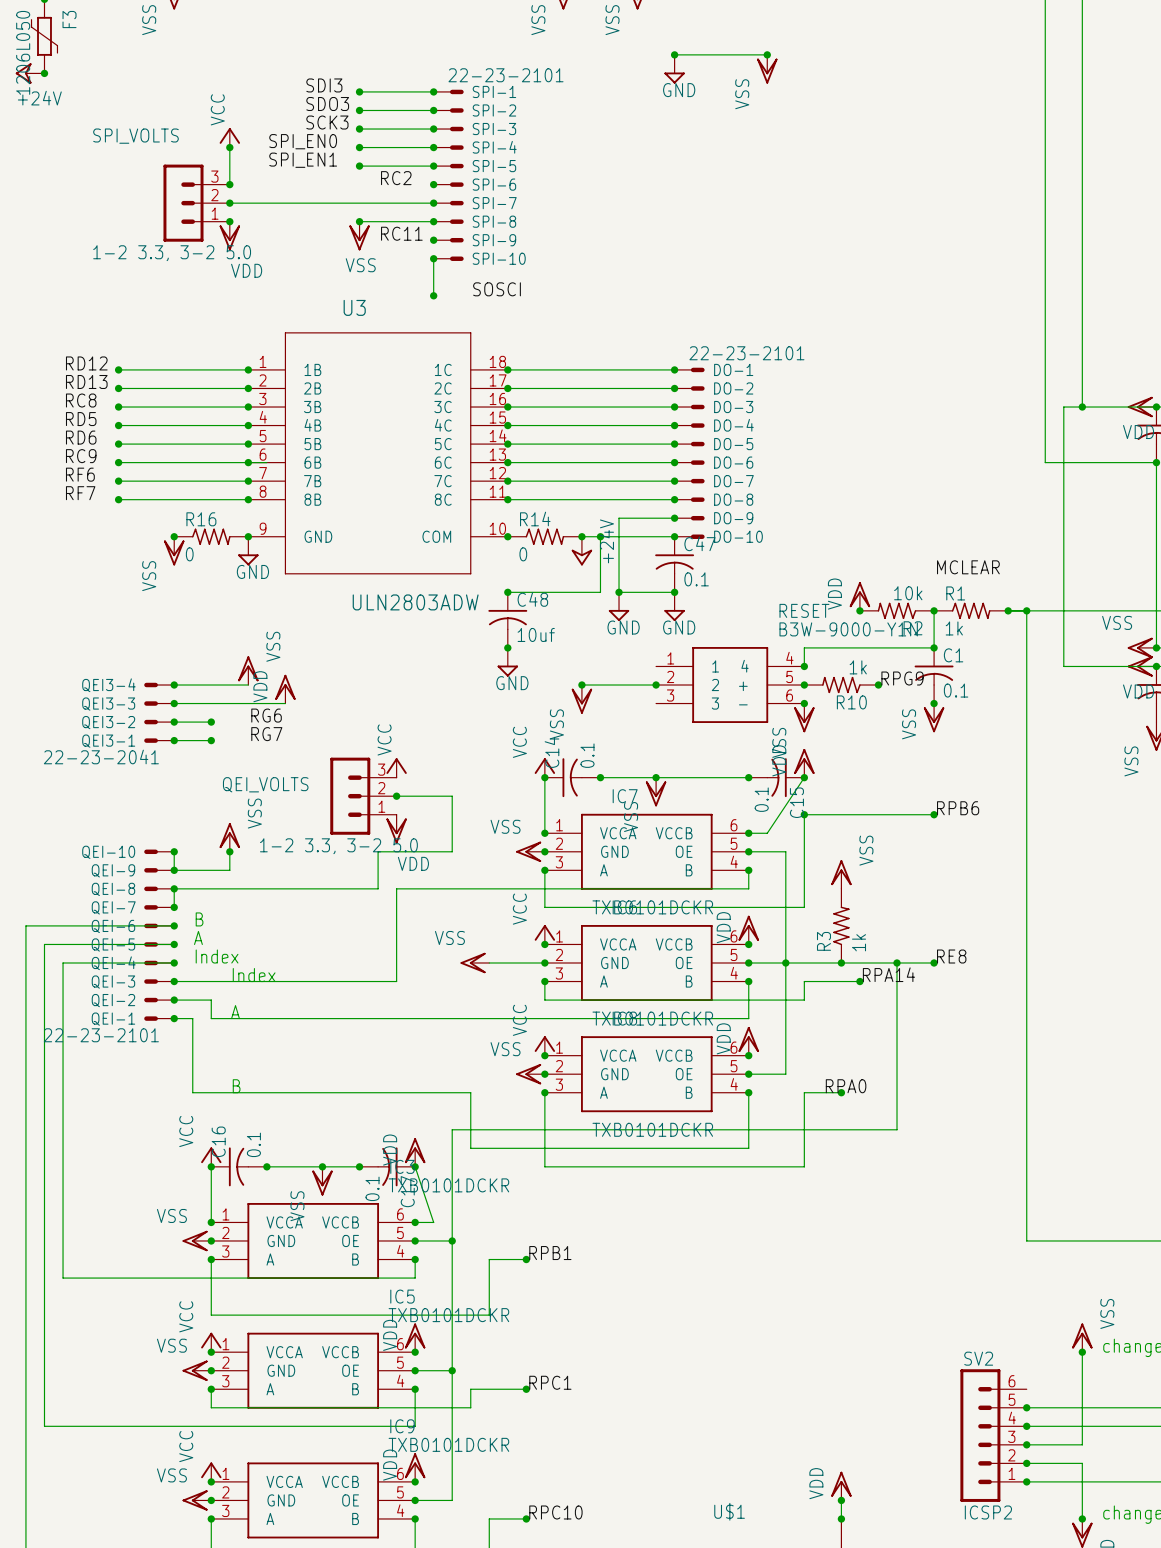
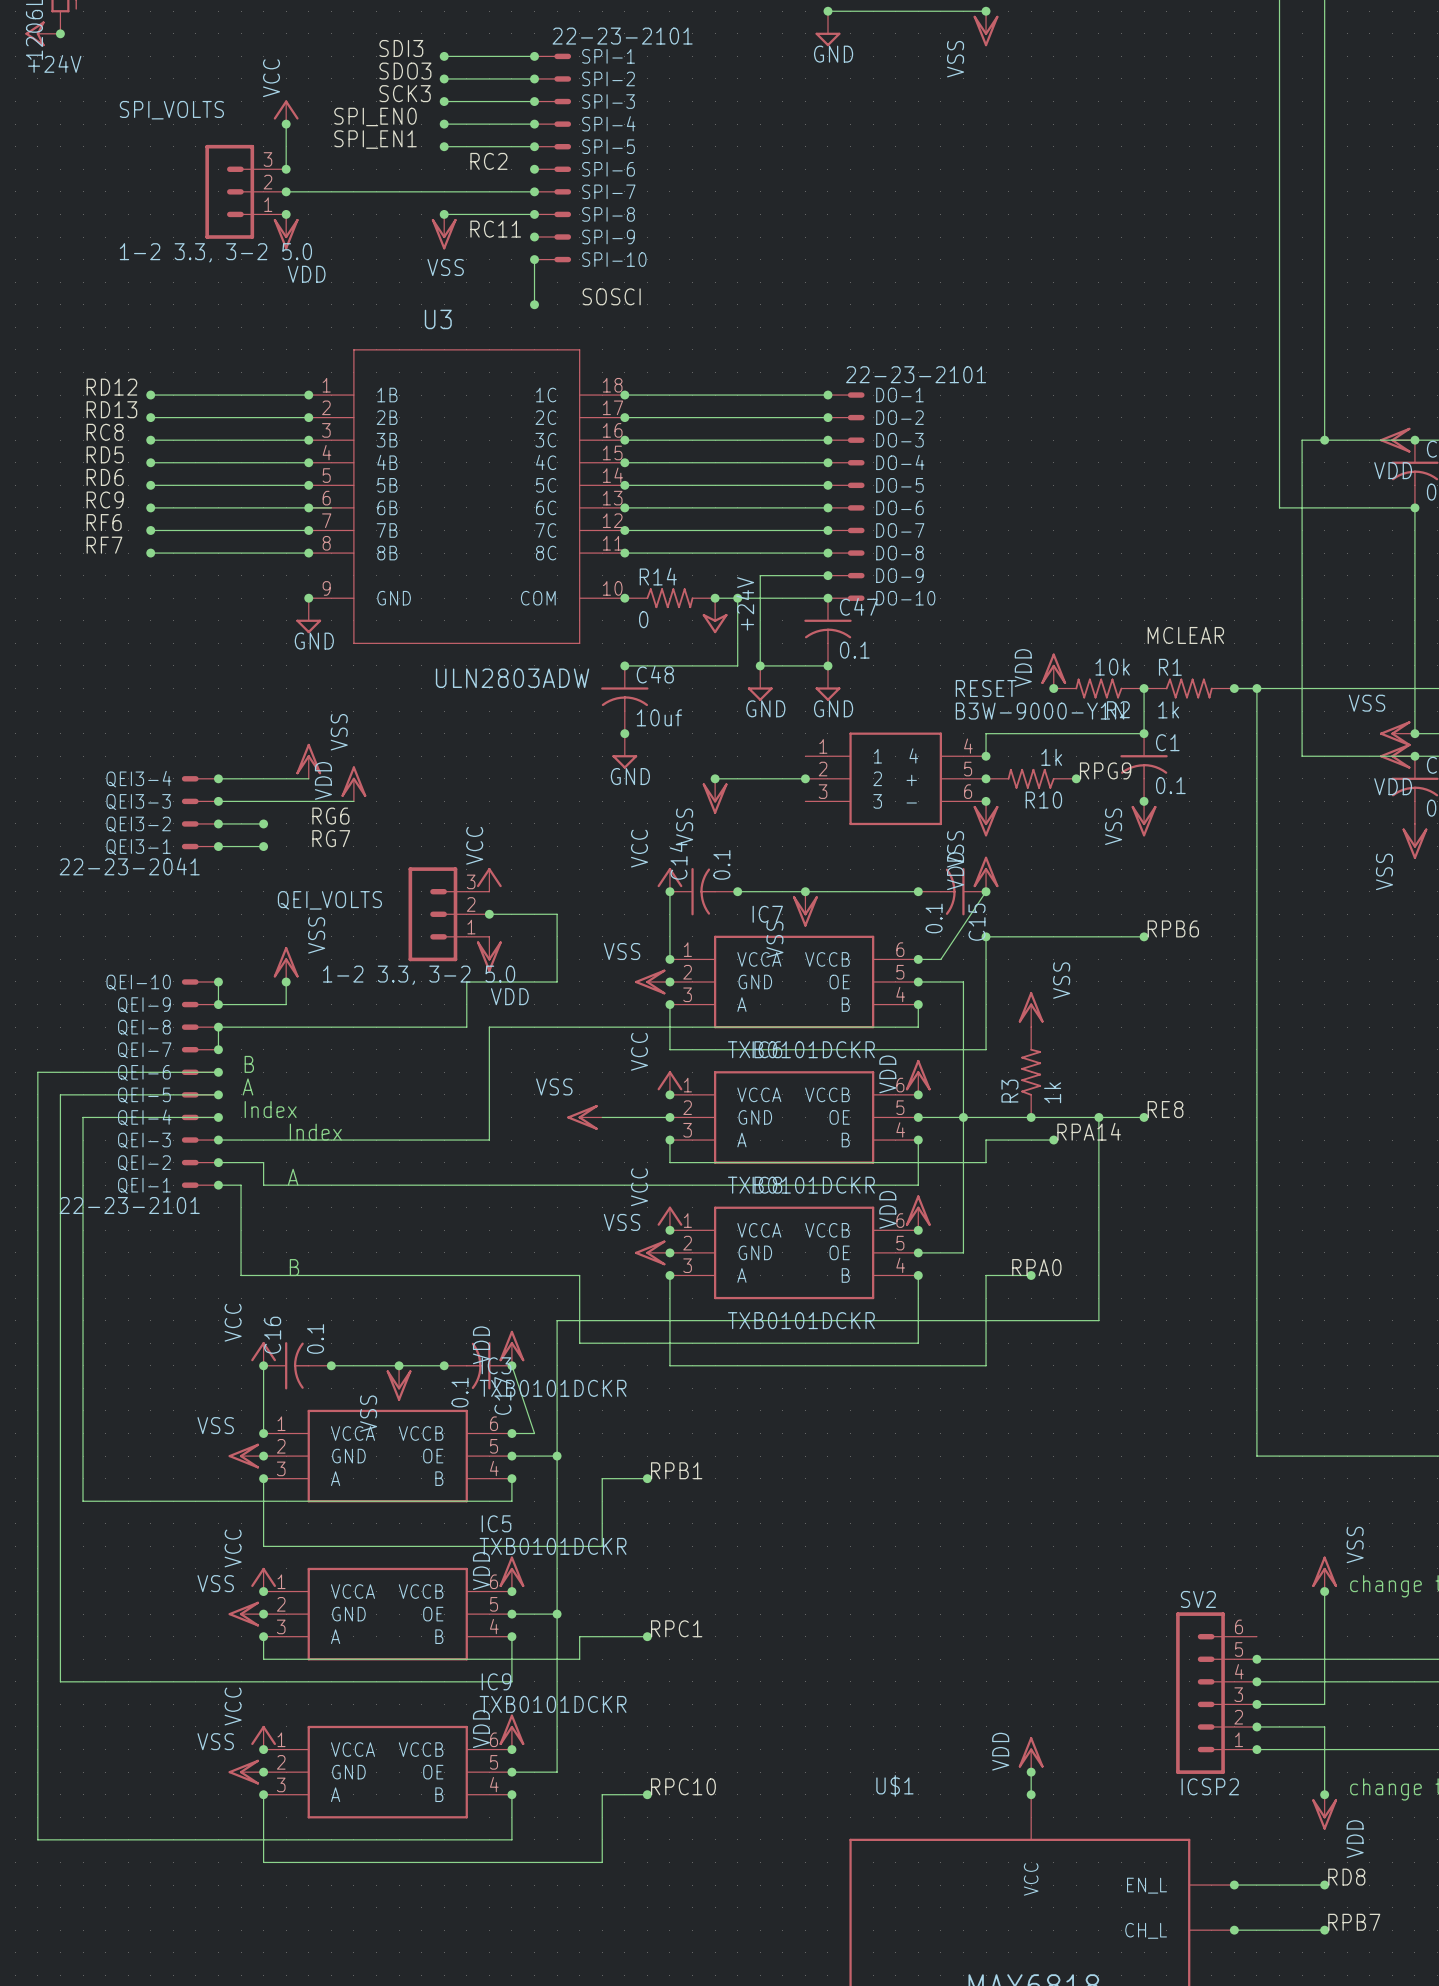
wire: none -> (940, 11) (986, 11)
junction position: (767, 54) -> (986, 11)
power symbol position: VSS (767, 69) -> VSS (986, 28)
junction: (174, 536) -> none
R16: 0 (211, 536) -> none
power symbol: VSS (174, 551) -> none

